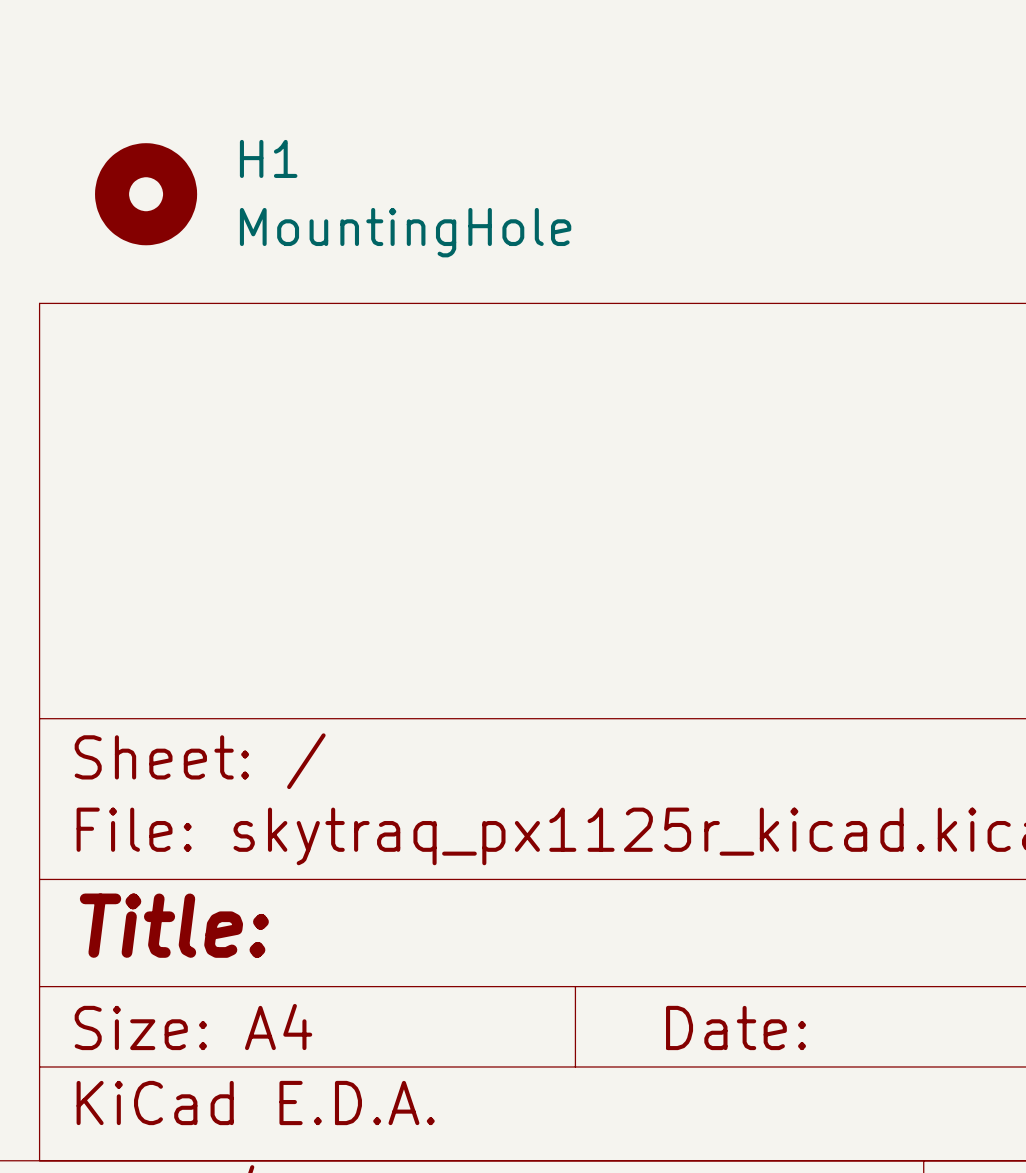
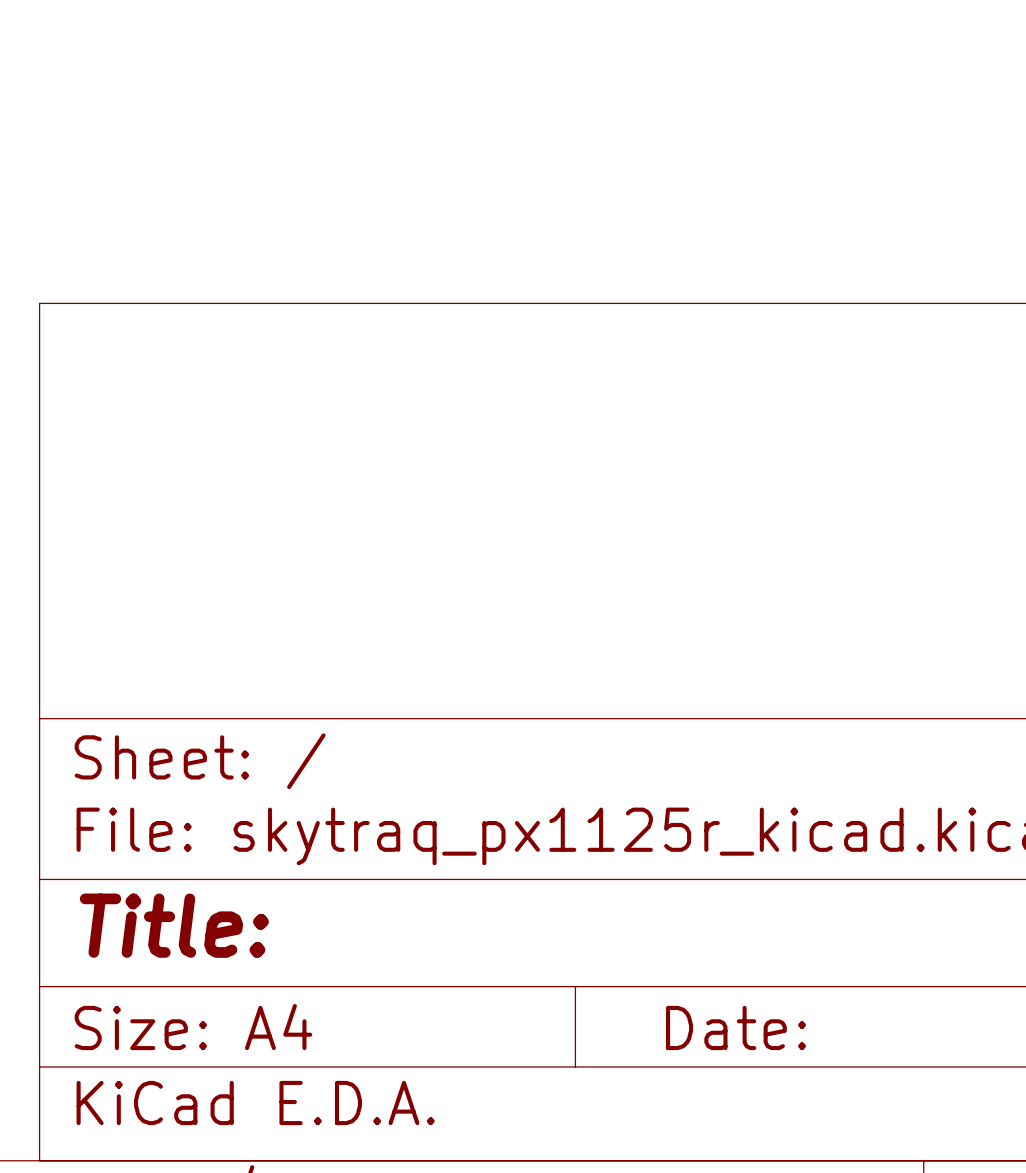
H1: MountingHole (146, 194) -> none

